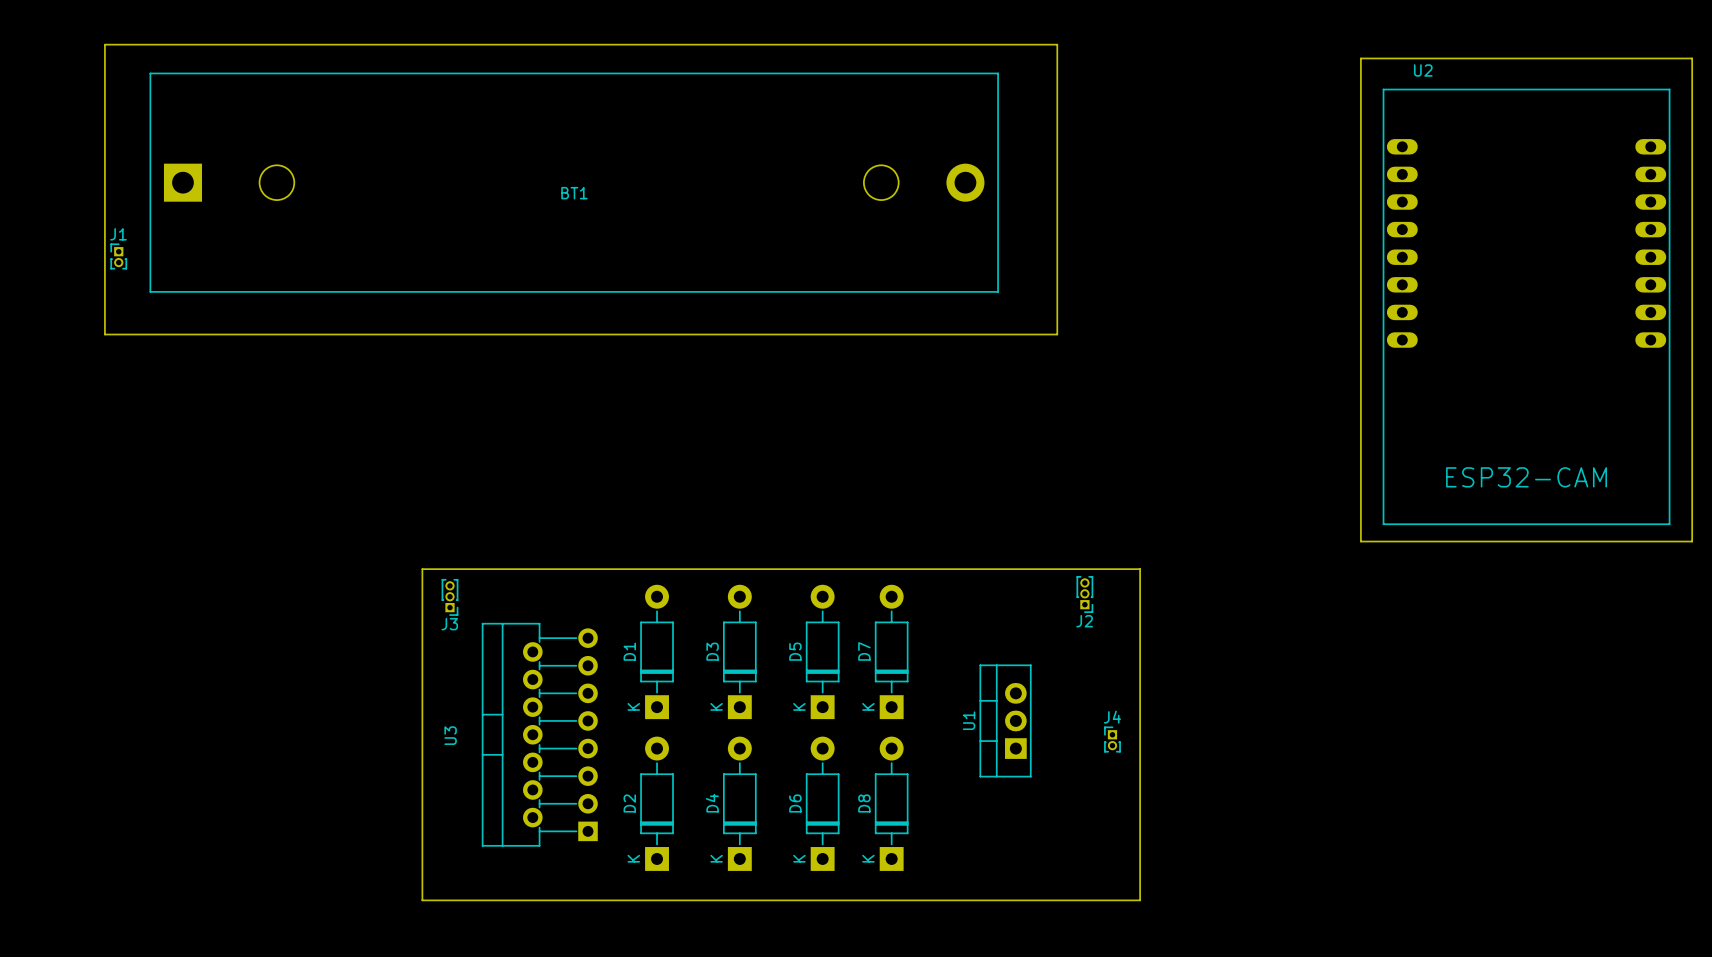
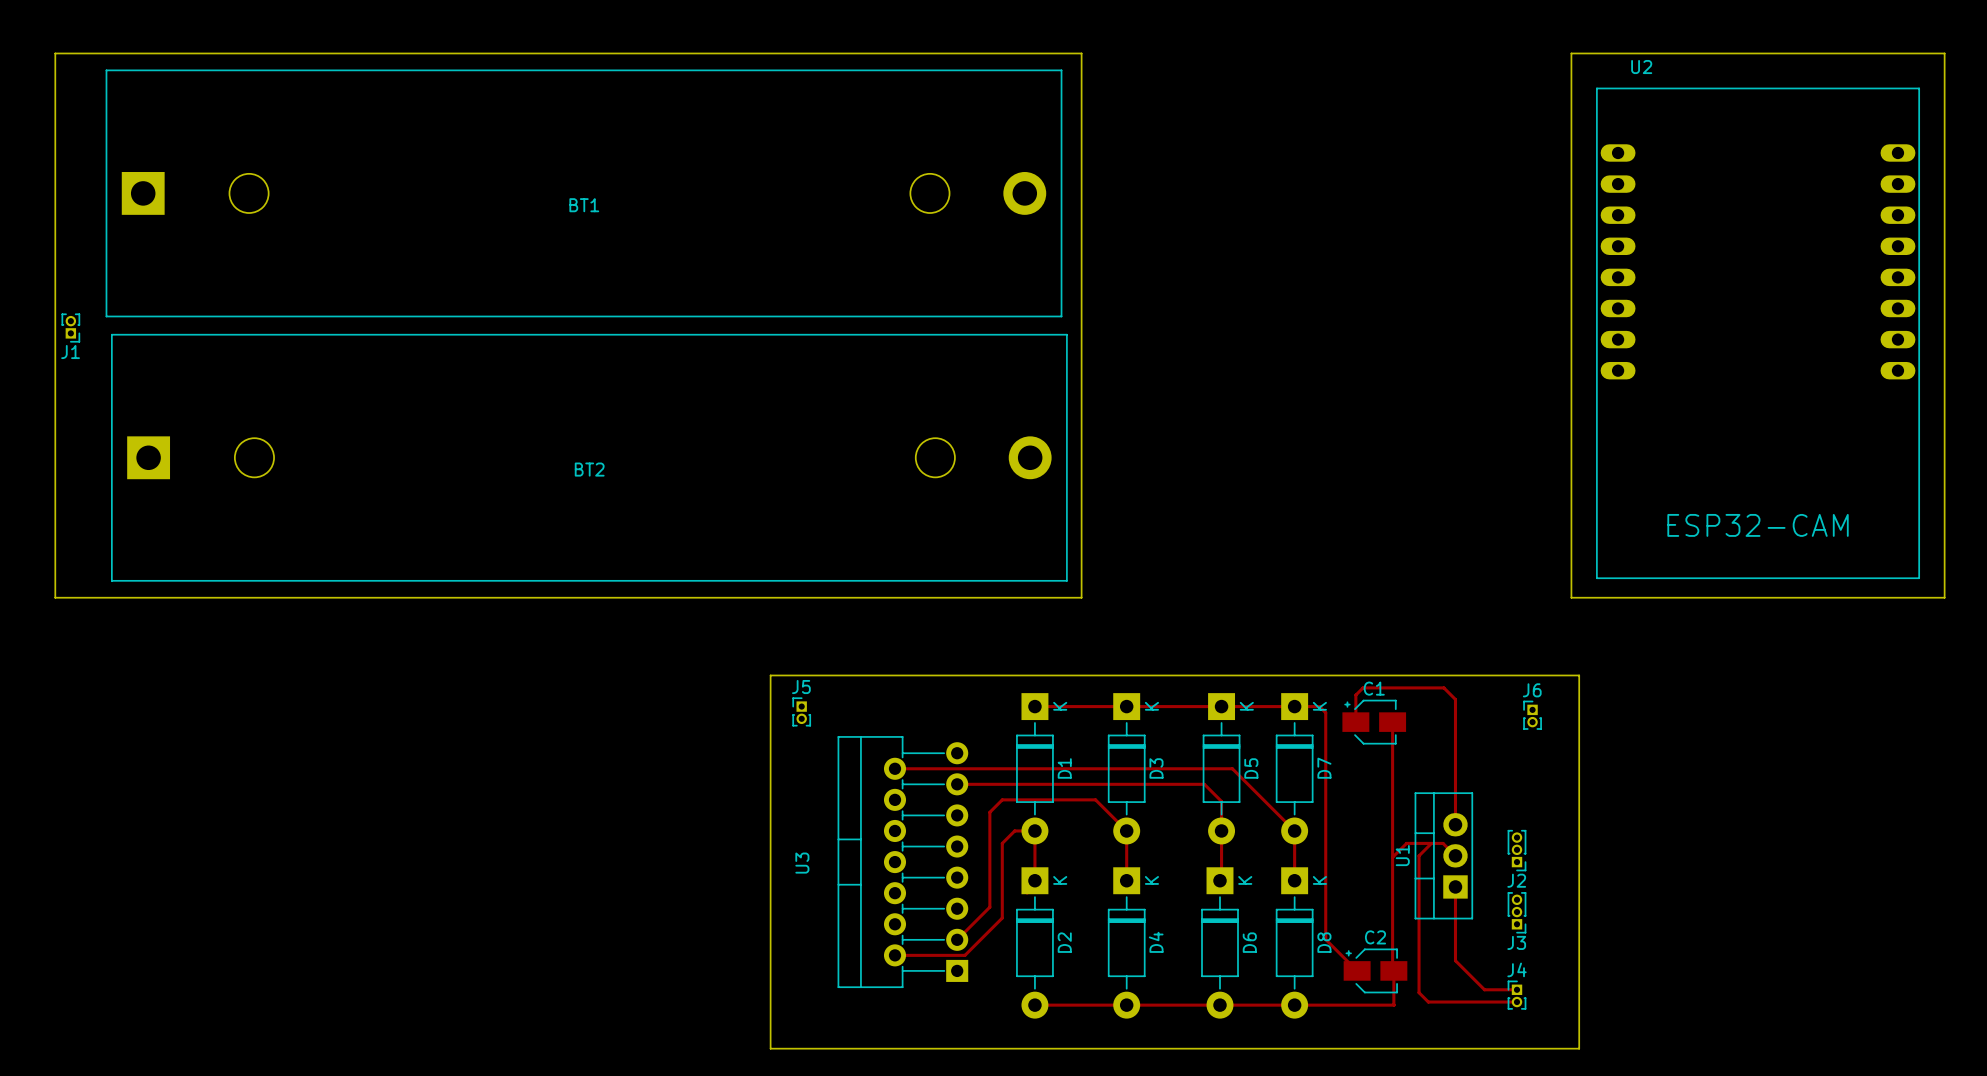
board edge: (104, 44) (1057, 44) (1057, 334) (104, 334) (104, 44) -> none
board edge: none -> (55, 53) (1081, 53) (1081, 597) (55, 597) (55, 53)
BT1 position: (574, 182) -> (584, 193)
J1 rotation: 0° (118, 256) -> 180° (70, 328)
J1 position: (118, 256) -> (70, 328)
BT2: none -> (589, 457)
board edge: (422, 569) (1140, 569) (1140, 900) (422, 900) (422, 569) -> (770, 675) (1579, 675) (1579, 1048) (770, 1048) (770, 675)
J2 position: (1084, 594) -> (1517, 850)
J3 position: (449, 597) -> (1517, 912)
U3 footprint: [481, 623, 598, 847] -> [837, 736, 969, 988]
top track: none -> (1034, 706) (1319, 706) (1325, 712) (1325, 939) (1357, 970)
J5: none -> (801, 711)
J6: none -> (1532, 715)
D1 rotation: 0° (657, 651) -> 180° (1034, 768)
D1 position: (657, 651) -> (1034, 768)
D3 rotation: 0° (739, 651) -> 180° (1126, 768)
D3 position: (739, 651) -> (1126, 768)
D5 rotation: 0° (822, 651) -> 180° (1221, 768)
D5 position: (822, 651) -> (1221, 768)
D7 rotation: 0° (891, 651) -> 180° (1294, 768)
D7 position: (891, 651) -> (1294, 768)
top track: none -> (1355, 722) (1355, 695) (1363, 687) (1443, 687) (1455, 699) (1455, 824)
C1: none -> (1374, 722)
top track: none -> (1392, 722) (1394, 1005) (1034, 1005)
top track: none -> (895, 768) (1232, 768) (1294, 830) (1294, 880)
top track: none -> (957, 784) (1204, 784) (1221, 801) (1221, 879) (1219, 880)
U1 position: (1005, 720) -> (1443, 855)
J4 position: (1112, 739) -> (1517, 995)
top track: none -> (1431, 843) (1419, 855) (1419, 992) (1428, 1002) (1517, 1002)
top track: none -> (1455, 855) (1443, 843) (1406, 843) (1392, 857)
top track: none -> (1126, 880) (1126, 830) (1095, 799) (1002, 799) (989, 812) (989, 907) (957, 939)
top track: none -> (1034, 885) (1034, 830) (1014, 830) (1002, 843) (1002, 918) (964, 955) (895, 955)
top track: none -> (1455, 886) (1455, 960) (1484, 989) (1517, 989)
D2 rotation: 0° (657, 803) -> 180° (1034, 942)
D2 position: (657, 803) -> (1034, 942)
D4 rotation: 0° (739, 803) -> 180° (1126, 942)
D4 position: (739, 803) -> (1126, 942)
D6 rotation: 0° (822, 803) -> 180° (1219, 942)
D6 position: (822, 803) -> (1219, 942)
D8 rotation: 0° (891, 803) -> 180° (1294, 942)
D8 position: (891, 803) -> (1294, 942)
C2: none -> (1375, 970)

